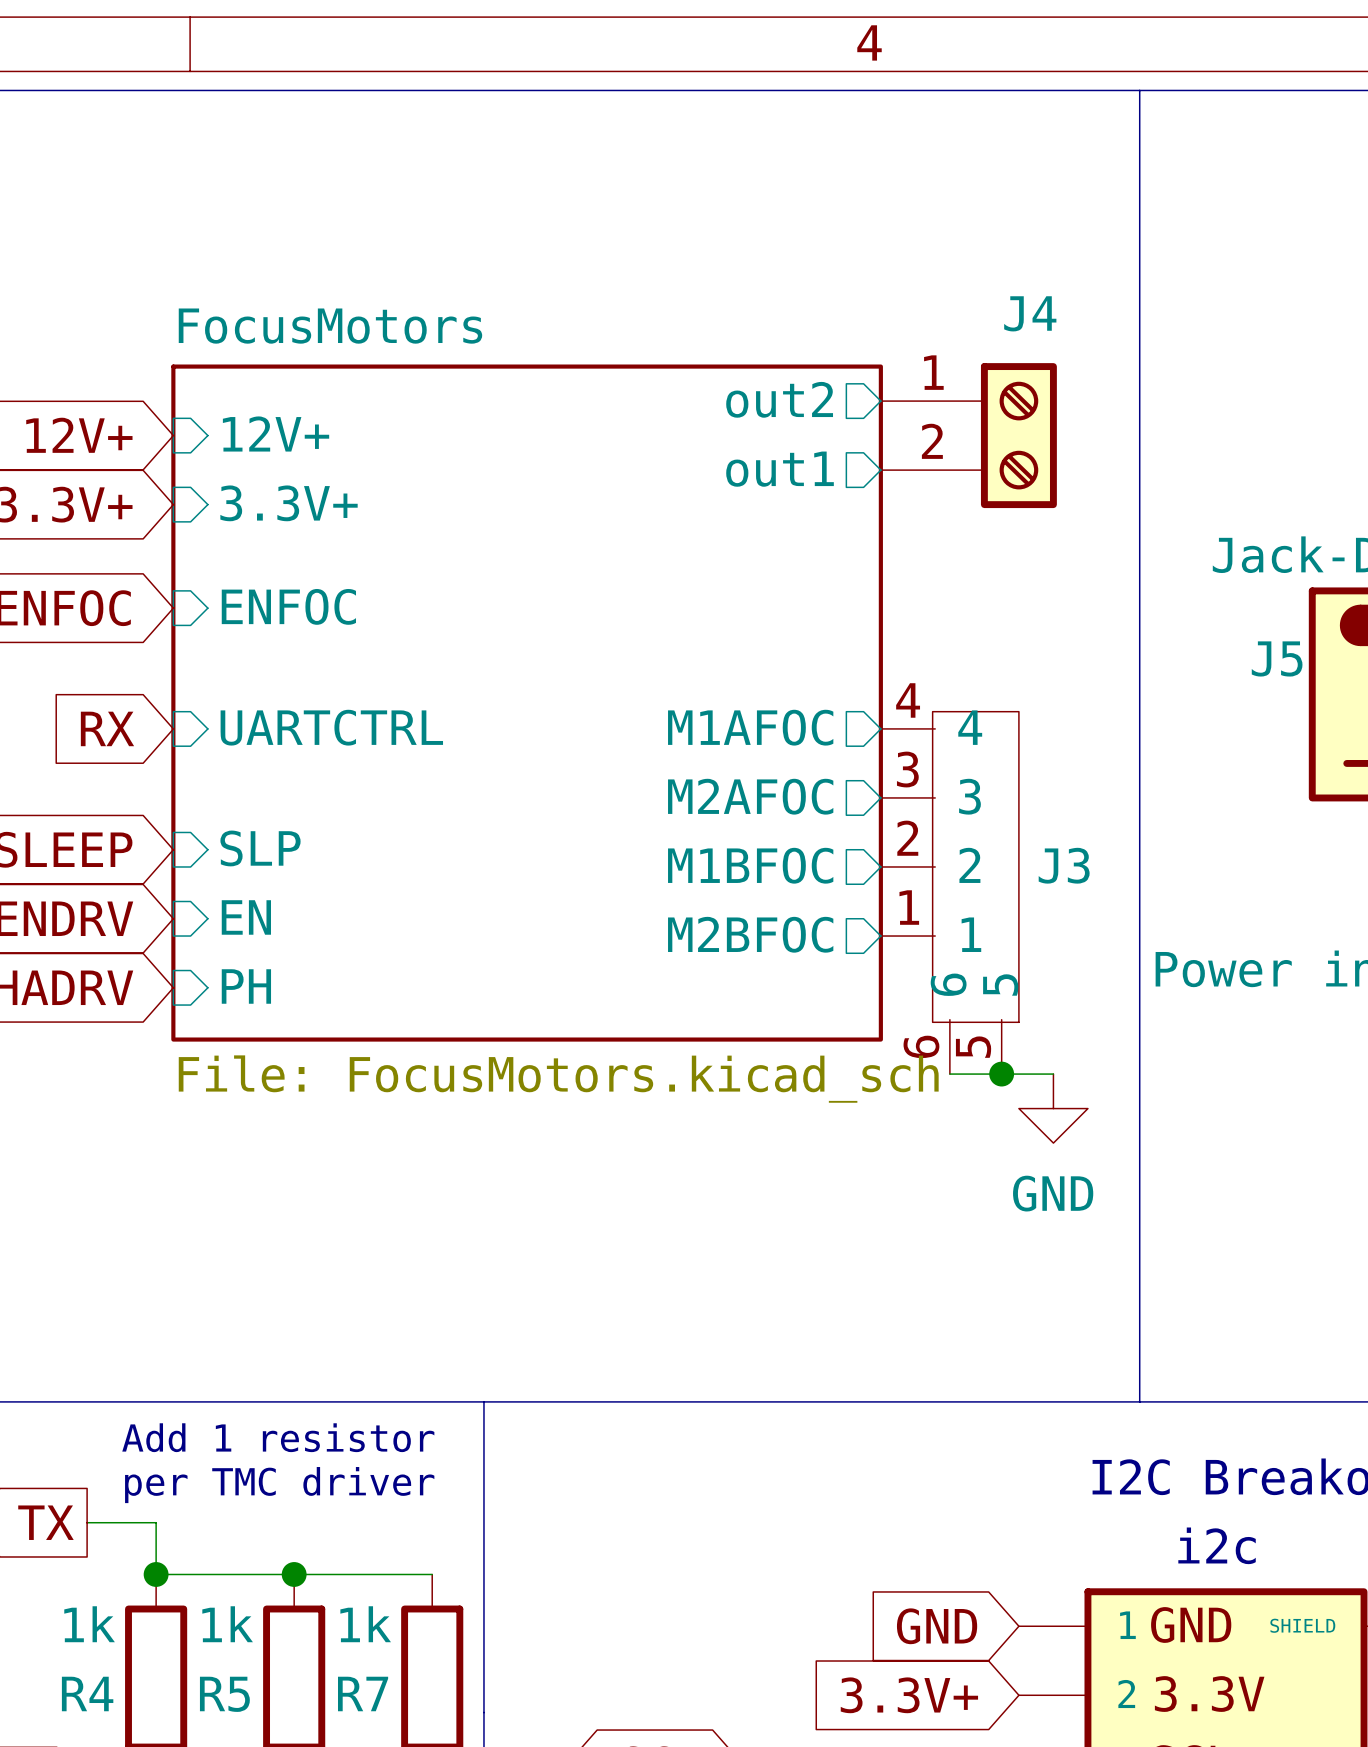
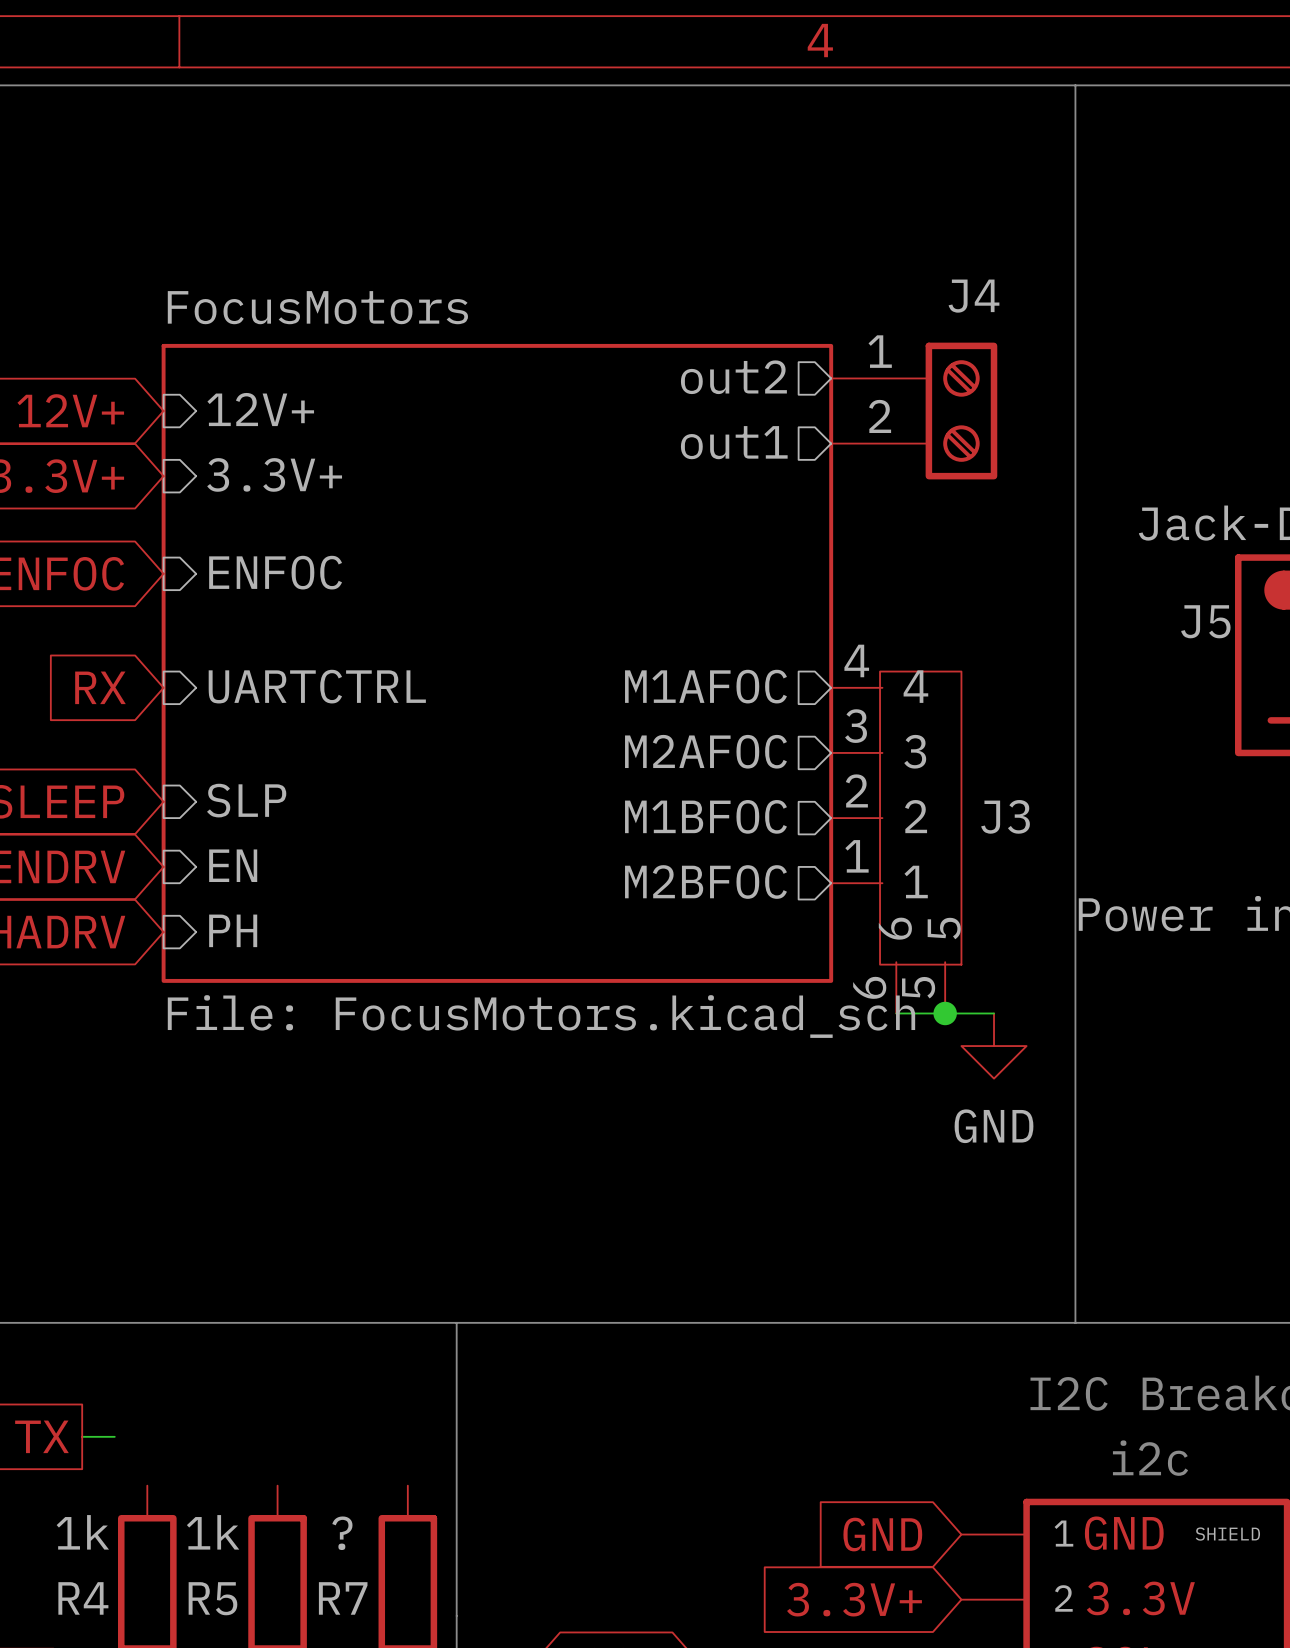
text: Add 1 resistor (278, 1437) -> none
text: per TMC driver (279, 1485) -> none
wire: (121, 1522) (156, 1522) (156, 1574) (432, 1574) -> none
junction: (156, 1574) -> none
junction: (294, 1574) -> none
R7 value: 1k (365, 1624) -> ? (342, 1533)

